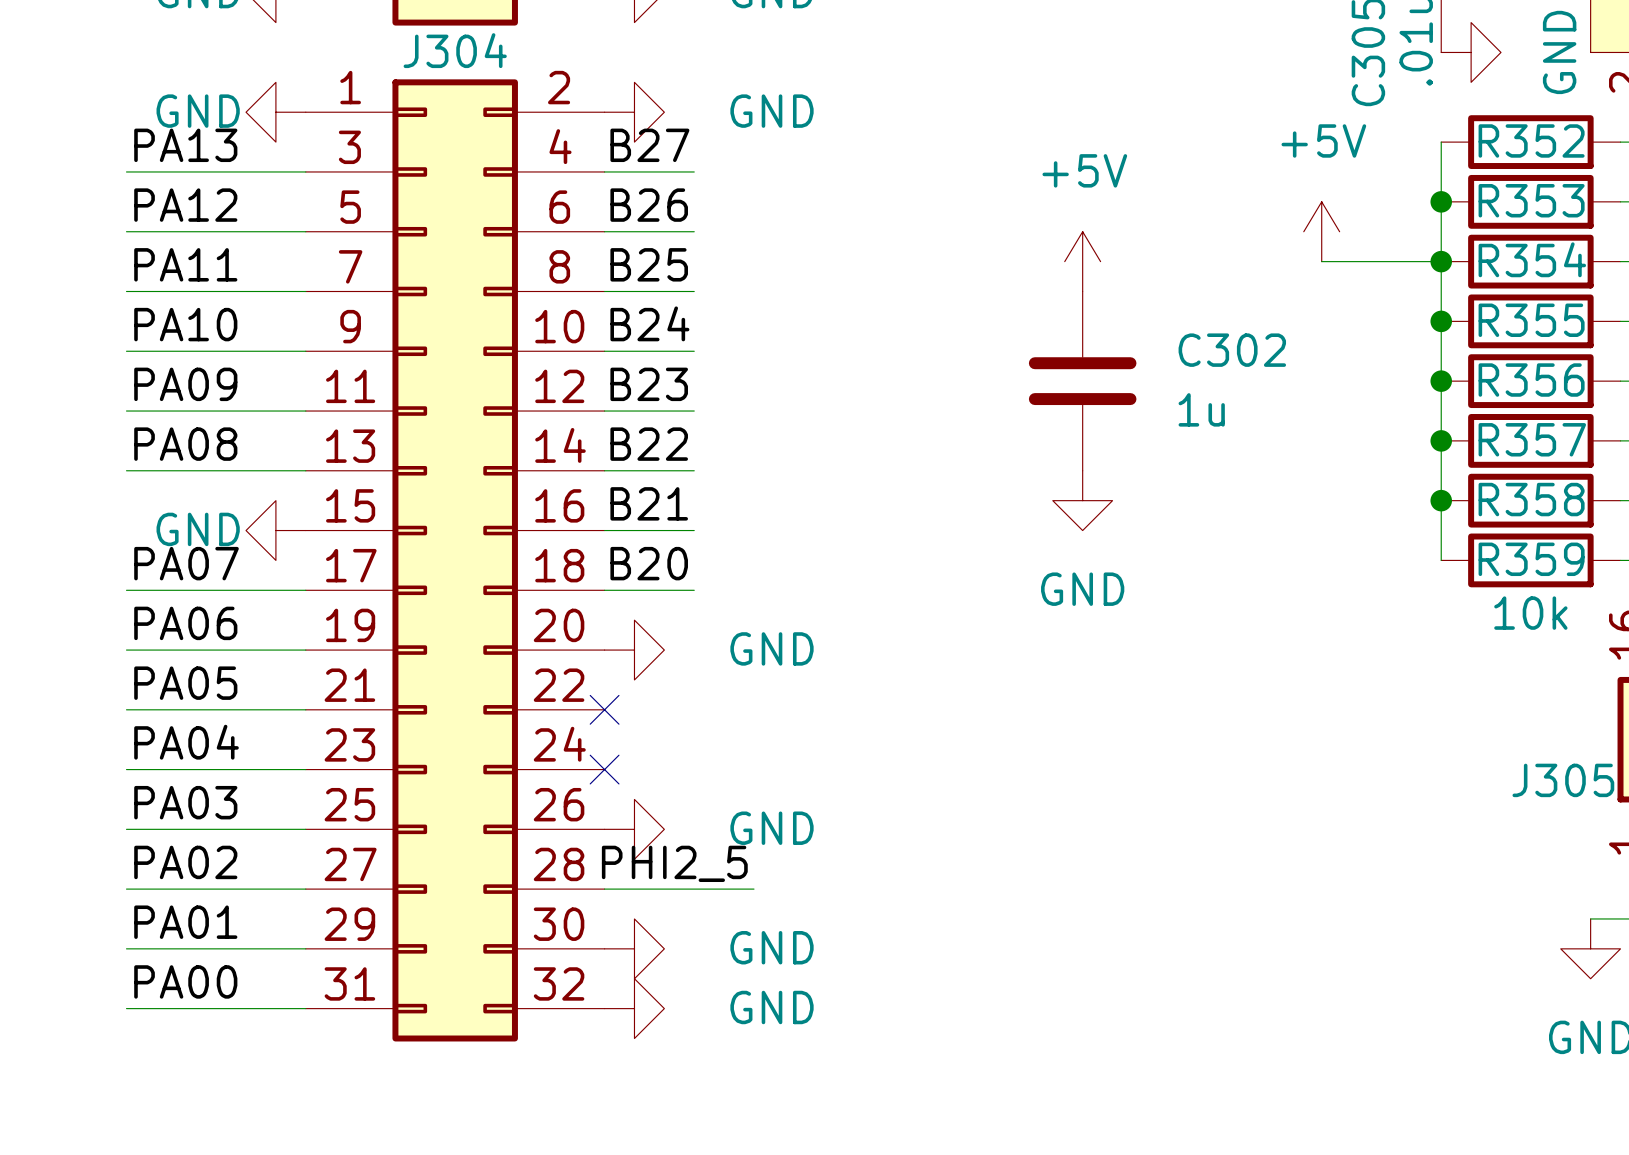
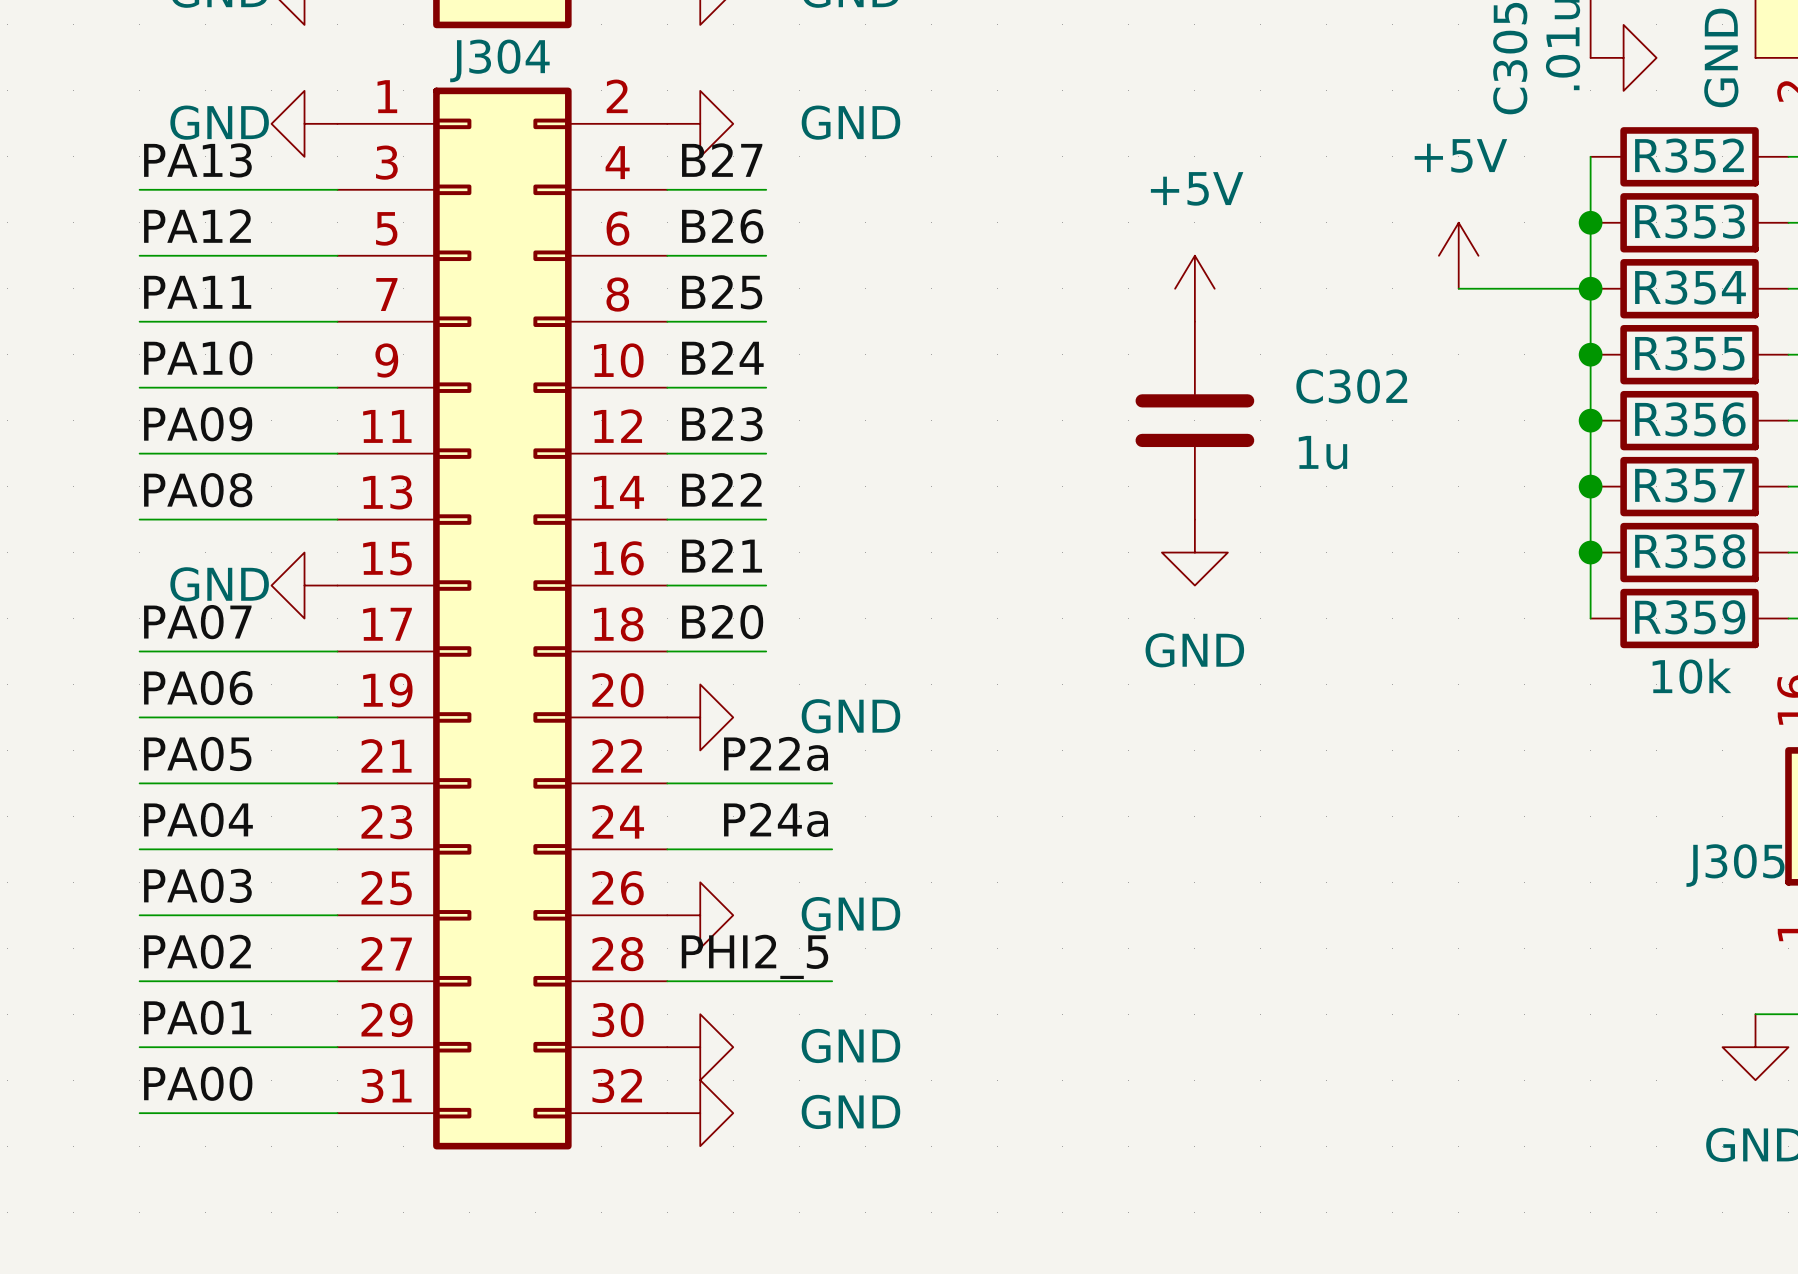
label: none -> P22a (776, 753)
wire: none -> (667, 783) (832, 783)
no-connect mark: (604, 709) -> none
label: none -> P24a (776, 819)
wire: none -> (667, 849) (832, 849)
no-connect mark: (604, 769) -> none

